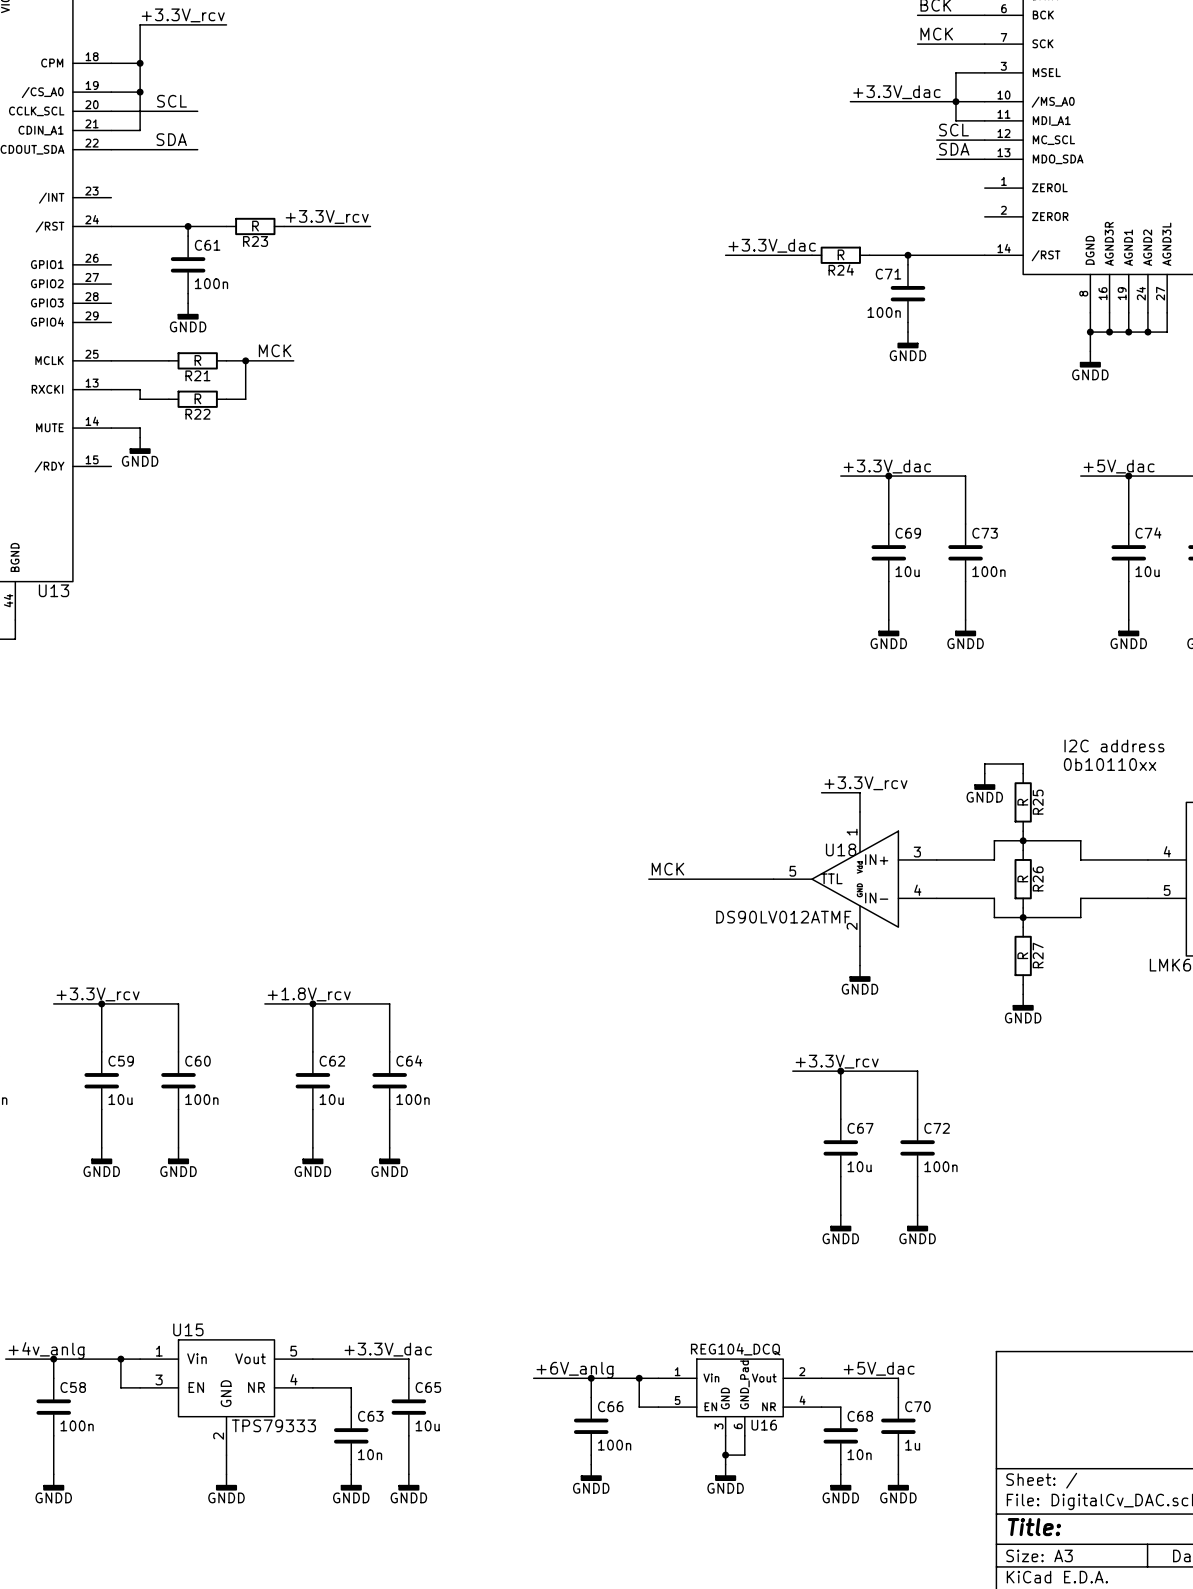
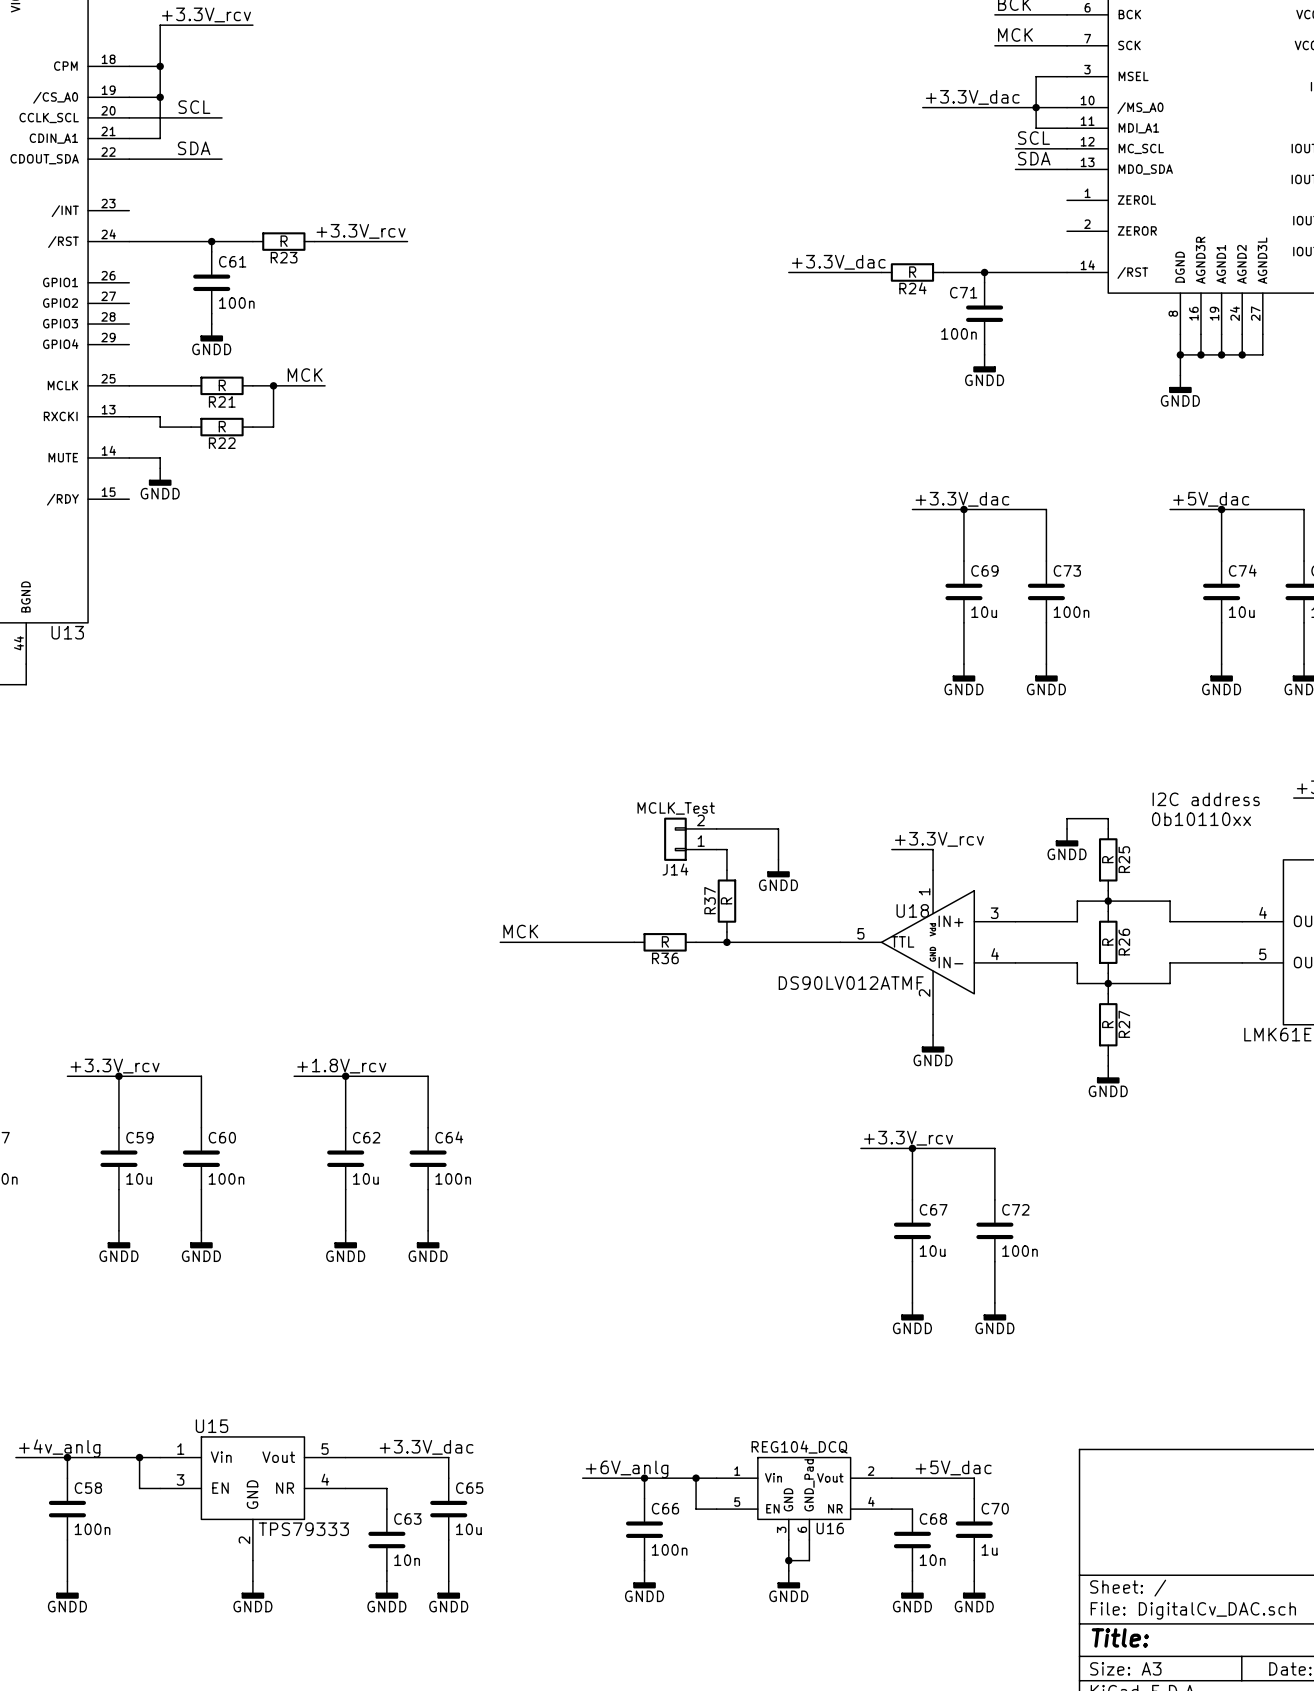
wire: none -> (716, 828) (778, 828) (778, 859)
J14: none -> MCLK_Test (690, 839)
wire: none -> (716, 849) (726, 849) (726, 870)
power symbol: none -> GNDD (778, 868)
R37: none -> R (726, 901)
label: none -> MCK (520, 931)
label: MCK (667, 869) -> none
wire: none -> (726, 932) (726, 942)
wire: none -> (500, 942) (634, 942)
R36: none -> R (665, 942)
wire: none -> (696, 942) (706, 942)
junction: none -> (726, 942)

